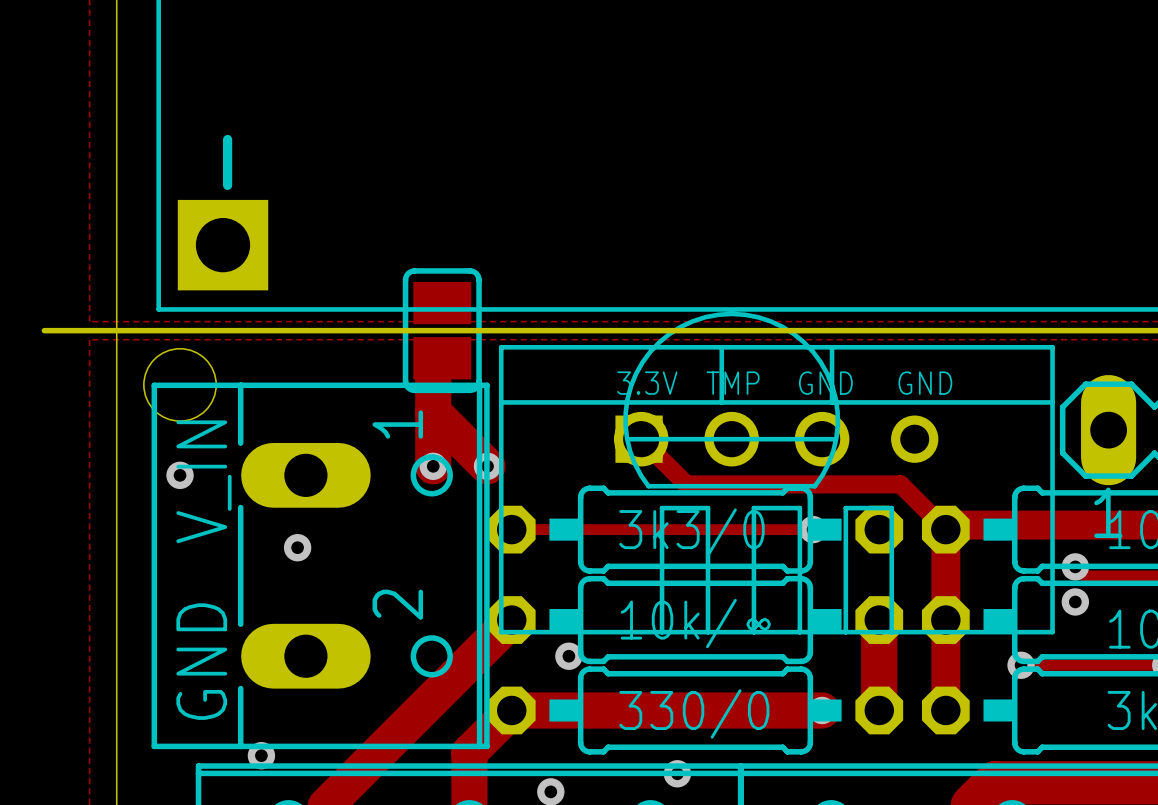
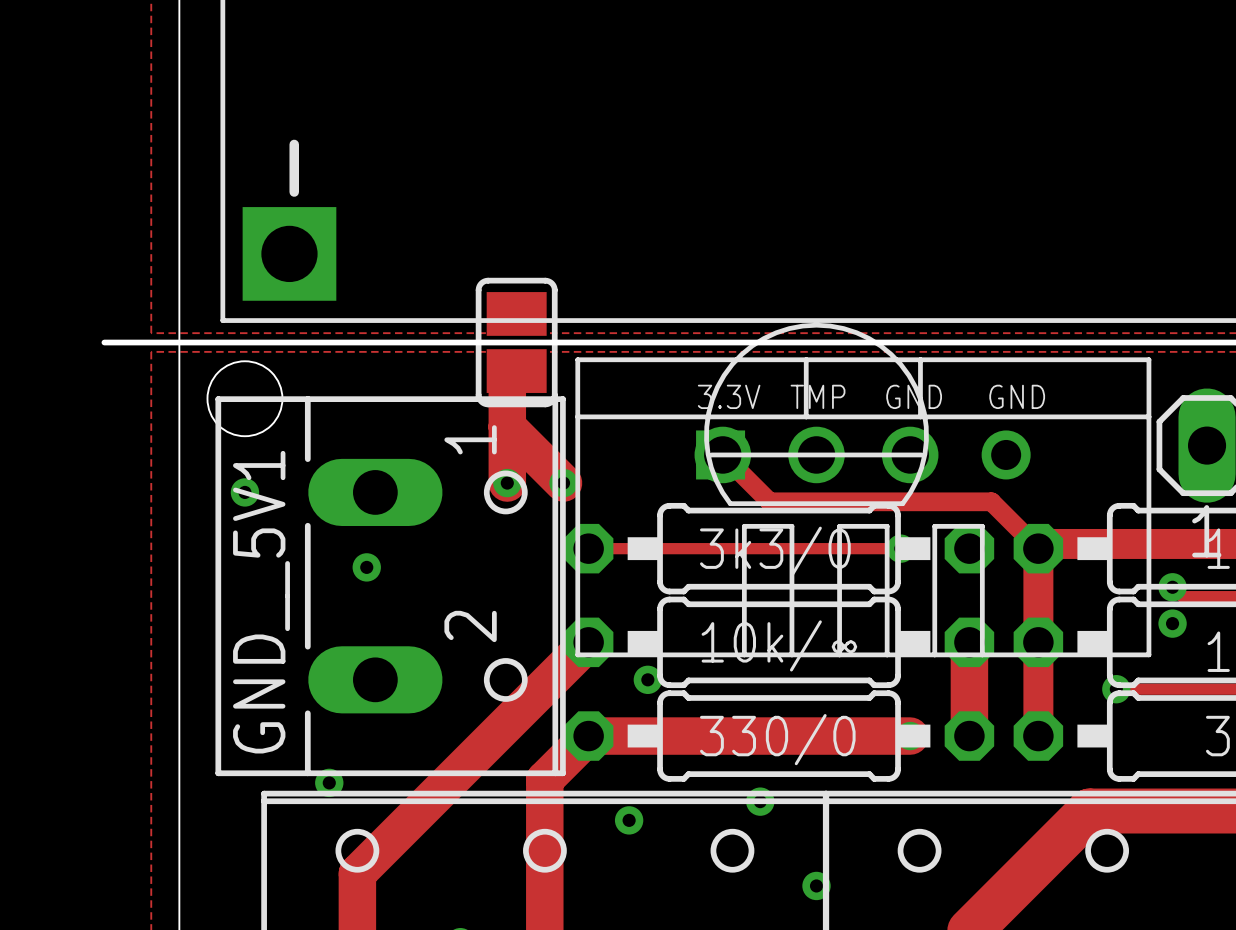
text: V_IN (203, 481) -> none
GND__5V1 name: none -> GND__5V1 (261, 602)
text: GND (201, 661) -> none

